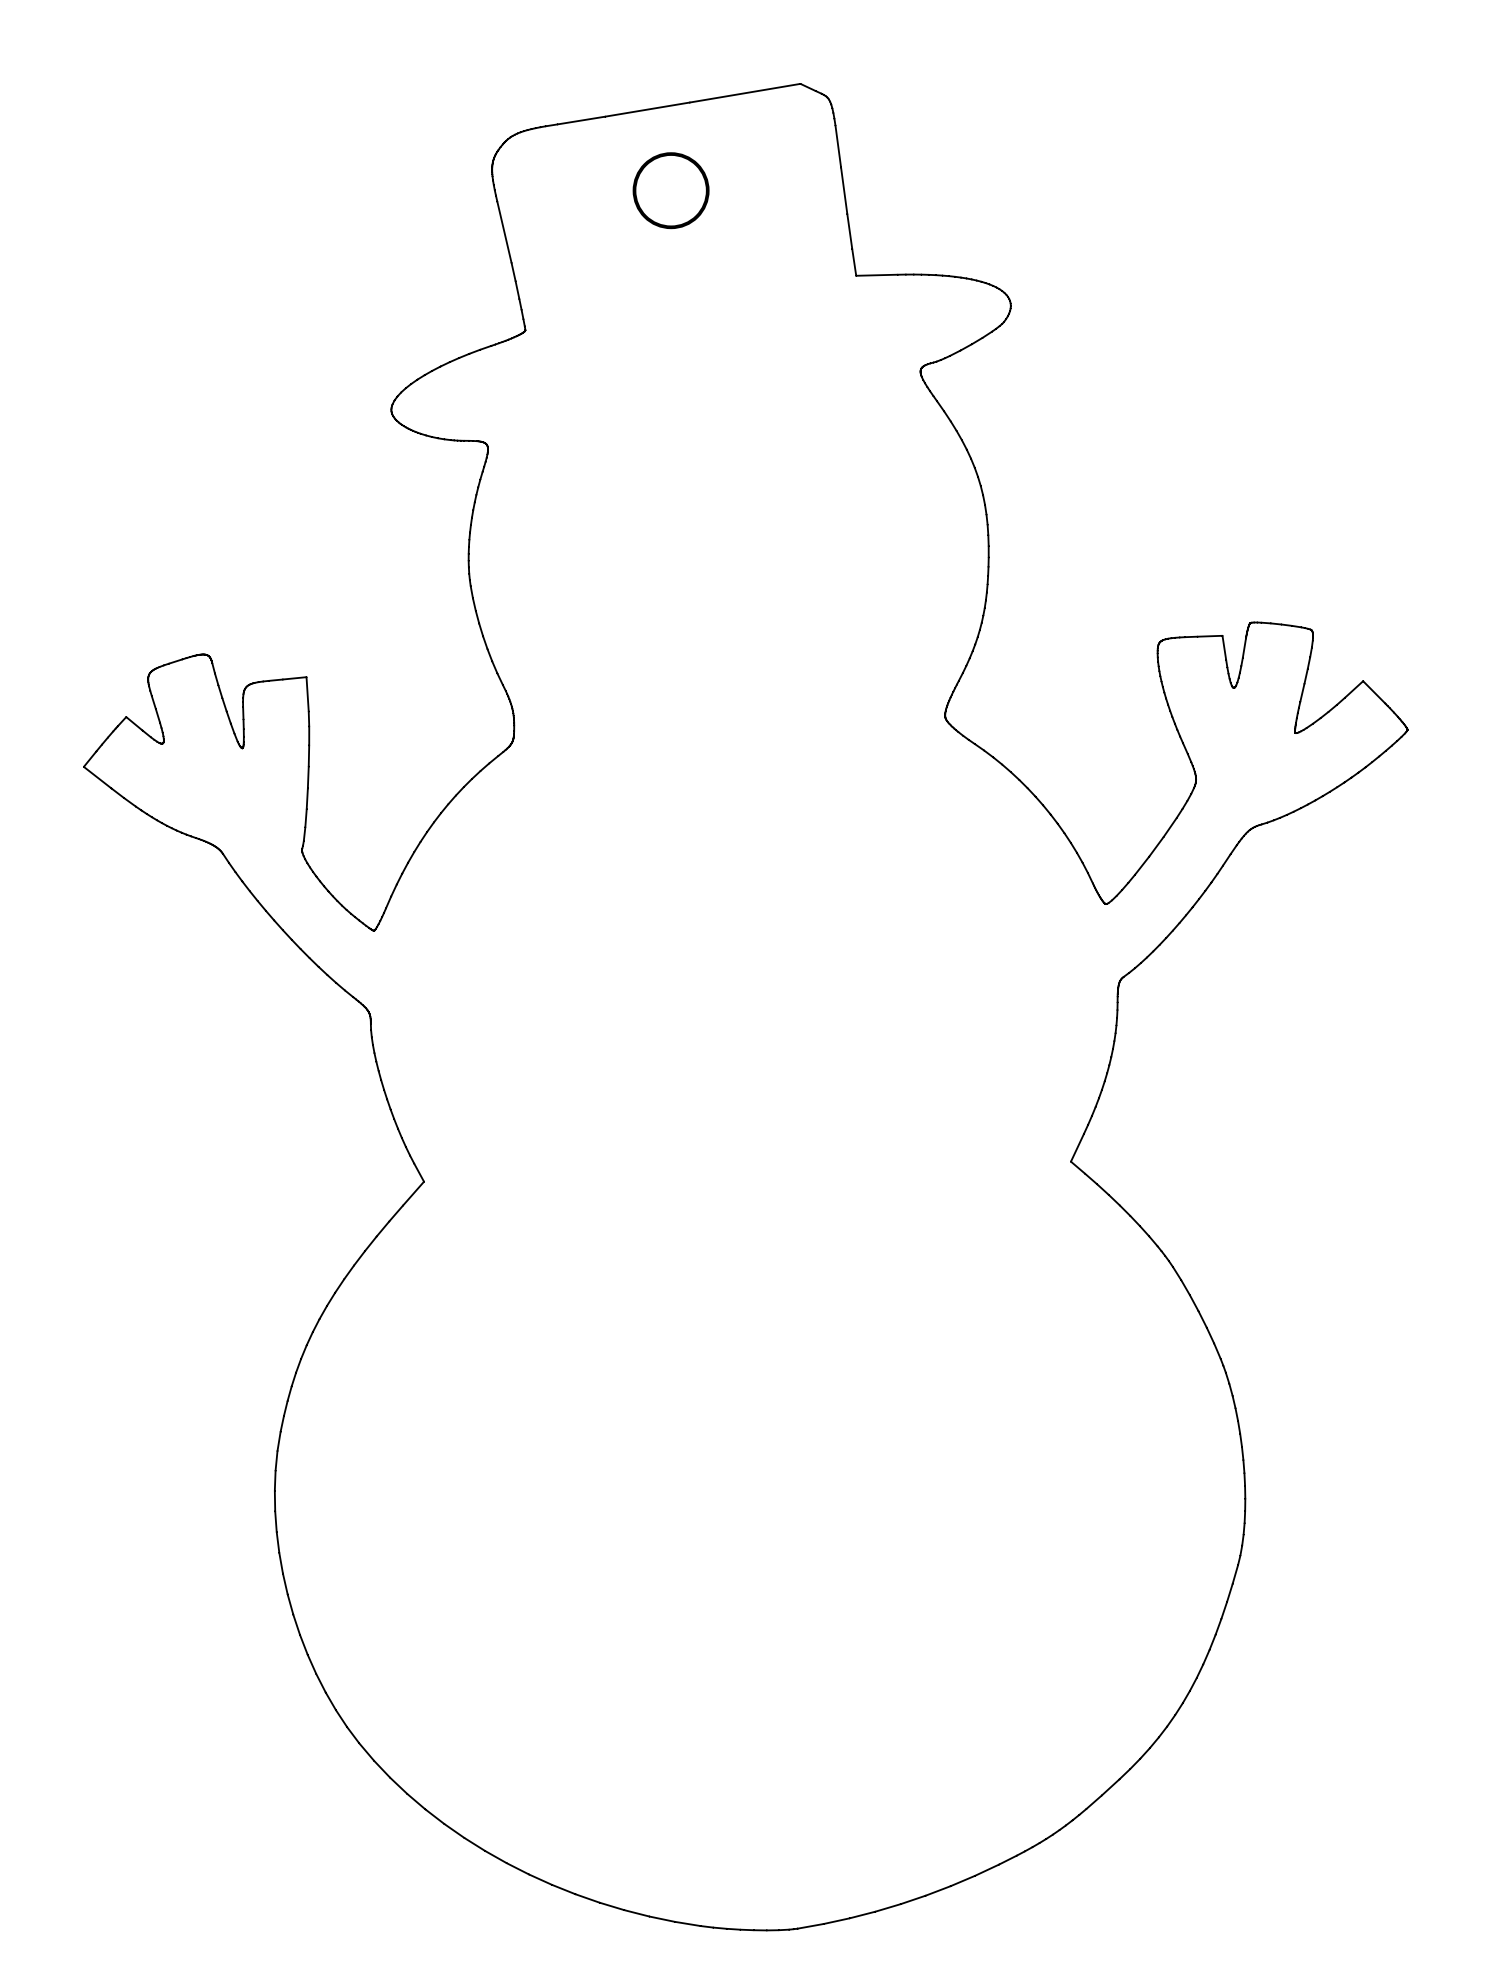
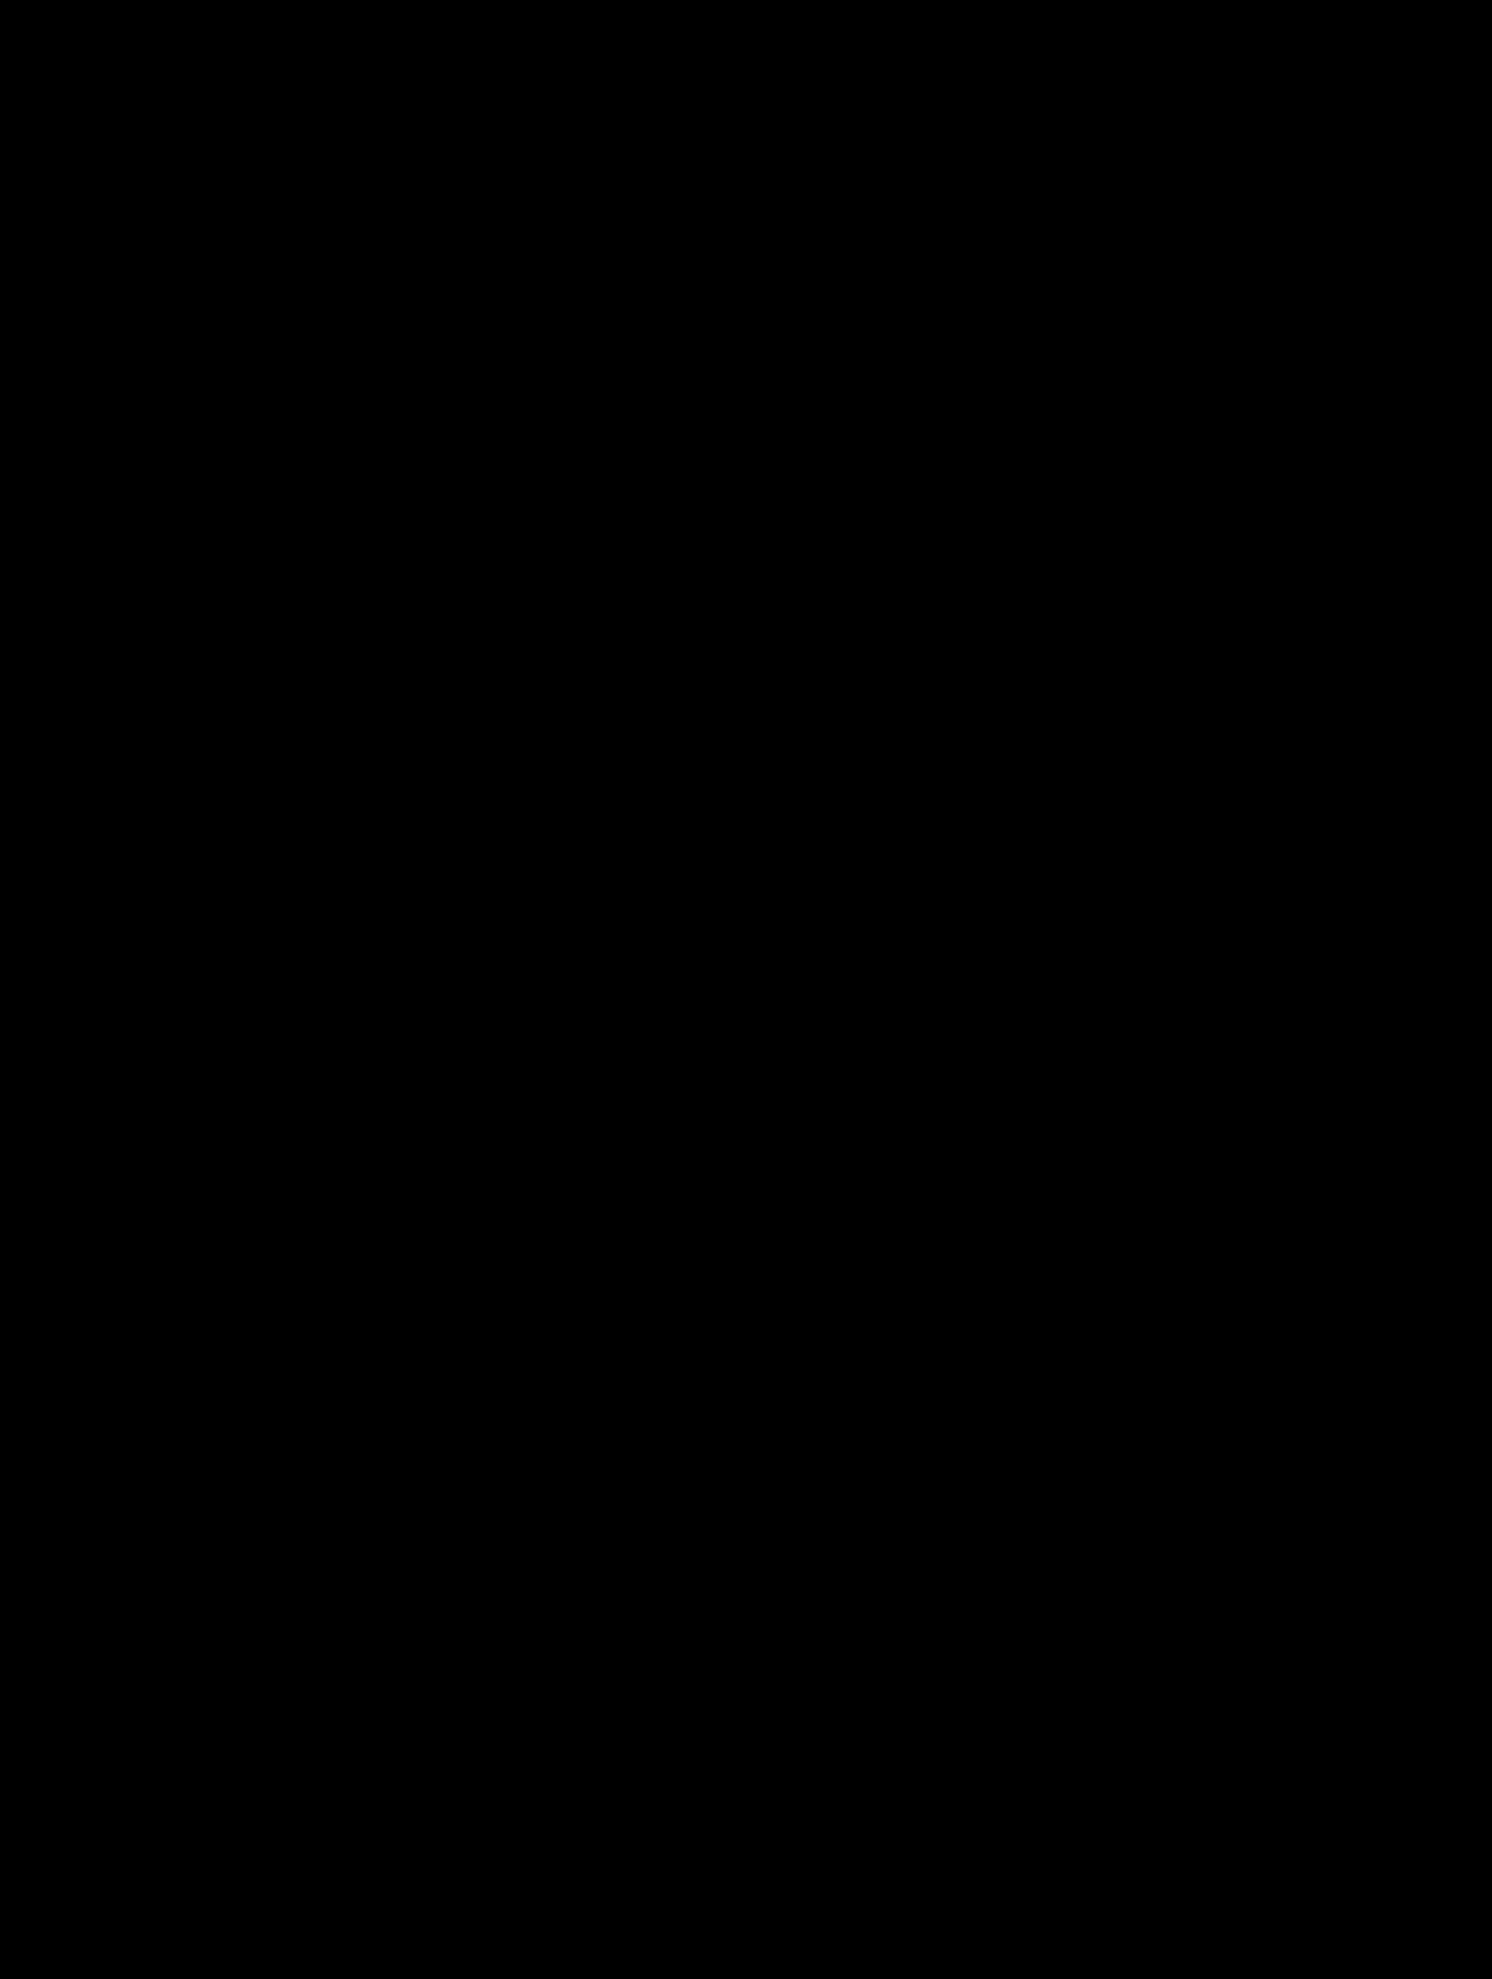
round board edge: [632, 152, 710, 230] -> none
board edge: (525, 330) (492, 174) (494, 156) (508, 138) (520, 132) (540, 127) (800, 83) (827, 97) (834, 118) (856, 275) (921, 274) (966, 278) (996, 287) (1006, 294) (1010, 301) (1009, 313) (999, 326) (960, 350) (924, 365) (920, 370) (925, 383) (956, 430) (970, 458) (980, 486) (987, 524) (988, 575) (983, 615) (975, 644) (949, 700) (945, 716) (956, 730) (1010, 772) (1043, 805) (1070, 842) (1105, 903) -> none
board edge: (525, 330) (514, 337) (459, 357) (432, 370) (405, 388) (397, 396) (391, 406) (391, 413) (396, 419) (415, 431) (444, 439) (481, 441) (487, 445) (487, 454) (476, 494) (470, 525) (469, 573) (472, 598) (483, 636) (511, 706) (514, 731) (513, 740) (509, 746) (463, 787) (427, 831) (402, 873) (374, 930) -> none
board edge: (1249, 623) (1238, 678) (1233, 687) (1229, 678) (1222, 635) (1171, 638) (1163, 640) (1158, 644) (1158, 661) (1162, 687) (1172, 717) (1193, 768) (1195, 783) (1182, 809) (1149, 856) (1122, 889) (1106, 904) -> none
board edge: (1250, 623) (1281, 624) (1312, 630) (1311, 647) (1295, 732) -> none
board edge: (1407, 729) (1363, 681) (1320, 718) (1295, 733) -> none
board edge: (1407, 729) (1379, 756) (1337, 787) (1293, 811) (1249, 830) (1179, 923) (1146, 957) (1121, 979) (1118, 989) (1114, 1041) (1107, 1073) (1092, 1115) (1070, 1161) (1130, 1215) (1172, 1266) (1189, 1295) (1214, 1343) (1225, 1372) (1235, 1408) (1241, 1446) (1245, 1486) (1242, 1545) (1221, 1618) (1203, 1664) (1189, 1690) (1167, 1726) (1130, 1769) (1072, 1820) (1032, 1847) (975, 1875) (900, 1904) (823, 1923) (793, 1929) (766, 1930) (700, 1926) (624, 1910) (552, 1884) (485, 1850) (425, 1809) (374, 1760) (335, 1710) (307, 1654) (287, 1594) (276, 1532) (275, 1470) (280, 1431) (287, 1401) (306, 1345) (335, 1292) (376, 1236) (424, 1181) (401, 1137) (387, 1099) (376, 1061) (370, 1016) (367, 1009) (318, 966) (282, 930) (249, 891) (219, 849) (152, 817) (83, 766) (126, 717) (154, 739) (163, 743) (162, 732) (148, 684) (148, 675) (159, 667) (200, 654) (207, 655) (210, 659) (230, 723) (242, 748) -> none
board edge: (243, 747) (243, 697) (246, 686) (258, 682) (306, 677) (308, 766) (302, 852) (313, 871) (332, 896) (351, 913) (373, 930) -> none

